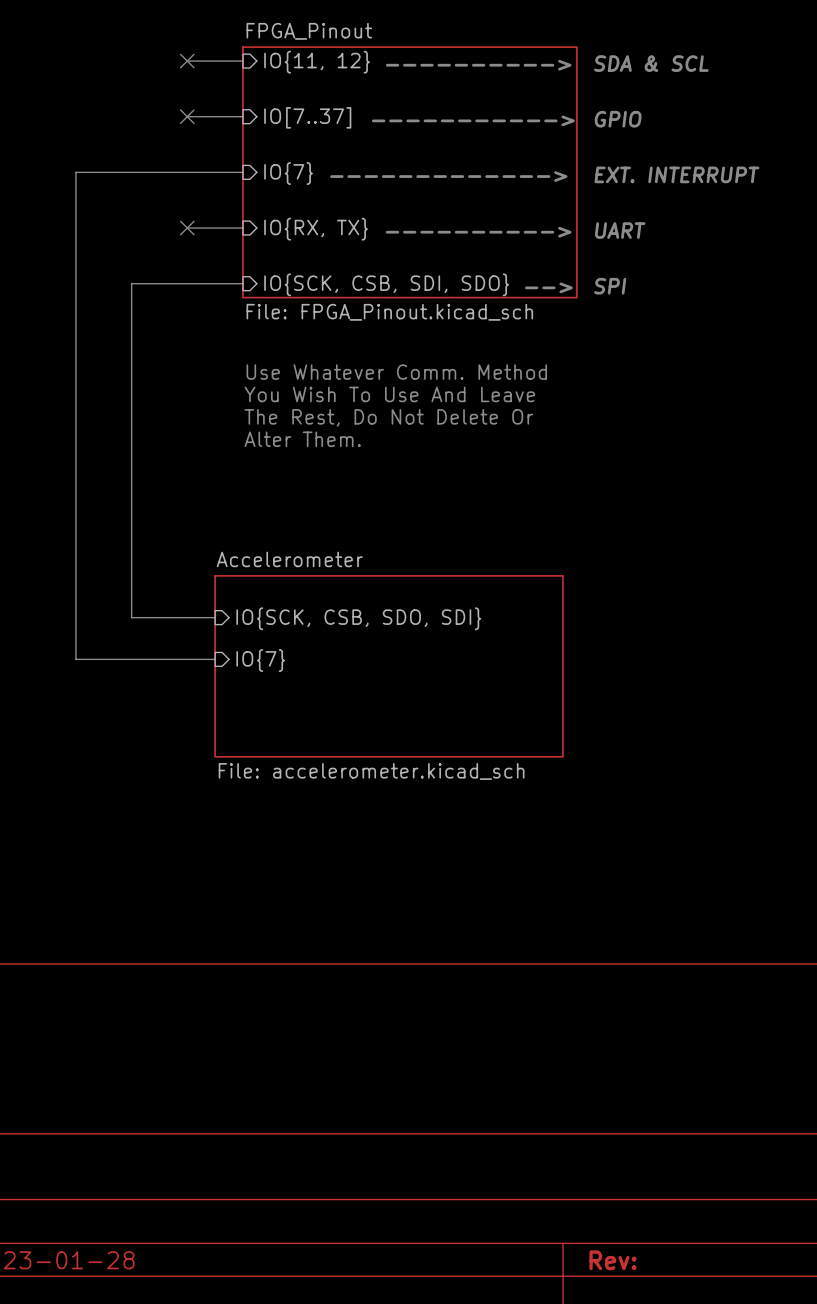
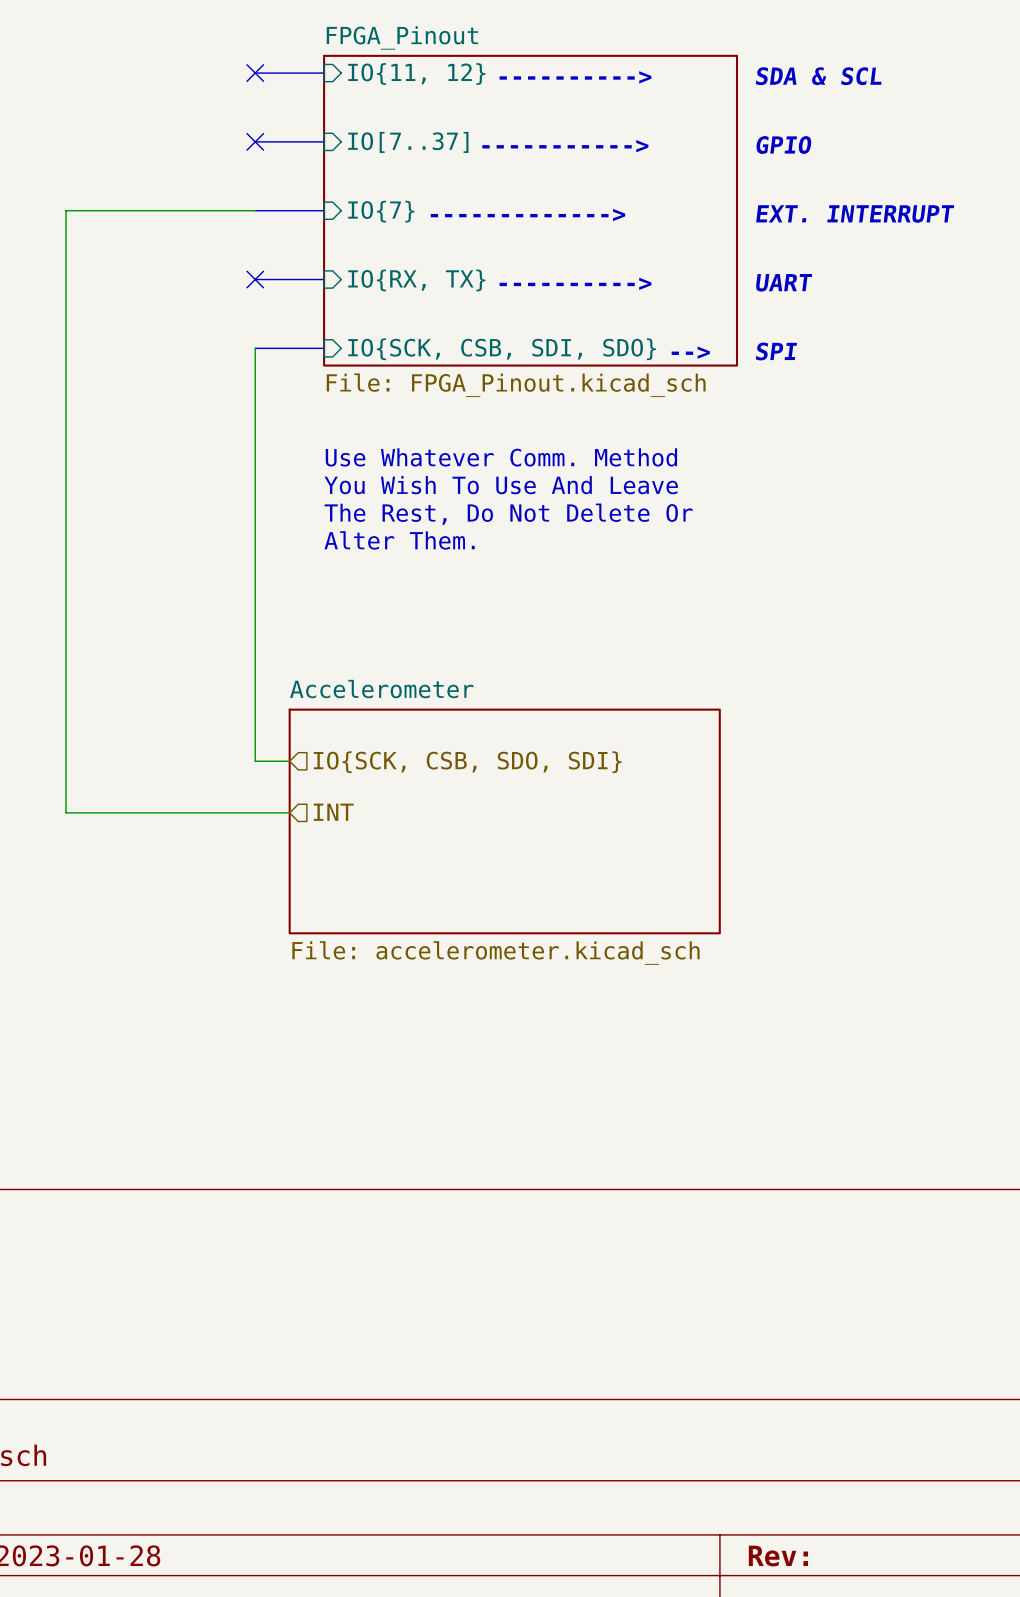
bus: (187, 172) (75, 172) (75, 659) (215, 659) -> none
wire: none -> (255, 210) (66, 210) (66, 812) (289, 812)
bus: (187, 283) (131, 283) (131, 617) (215, 617) -> none
wire: none -> (255, 348) (255, 761) (289, 761)
sheet pin: IO{SCK, CSB, SDO, SDI} (358, 618) -> none
hierarchical label: none -> IO{SCK, CSB, SDO, SDI} (467, 762)
hierarchical label: none -> INT (333, 812)
sheet pin: IO{7} (260, 660) -> none

